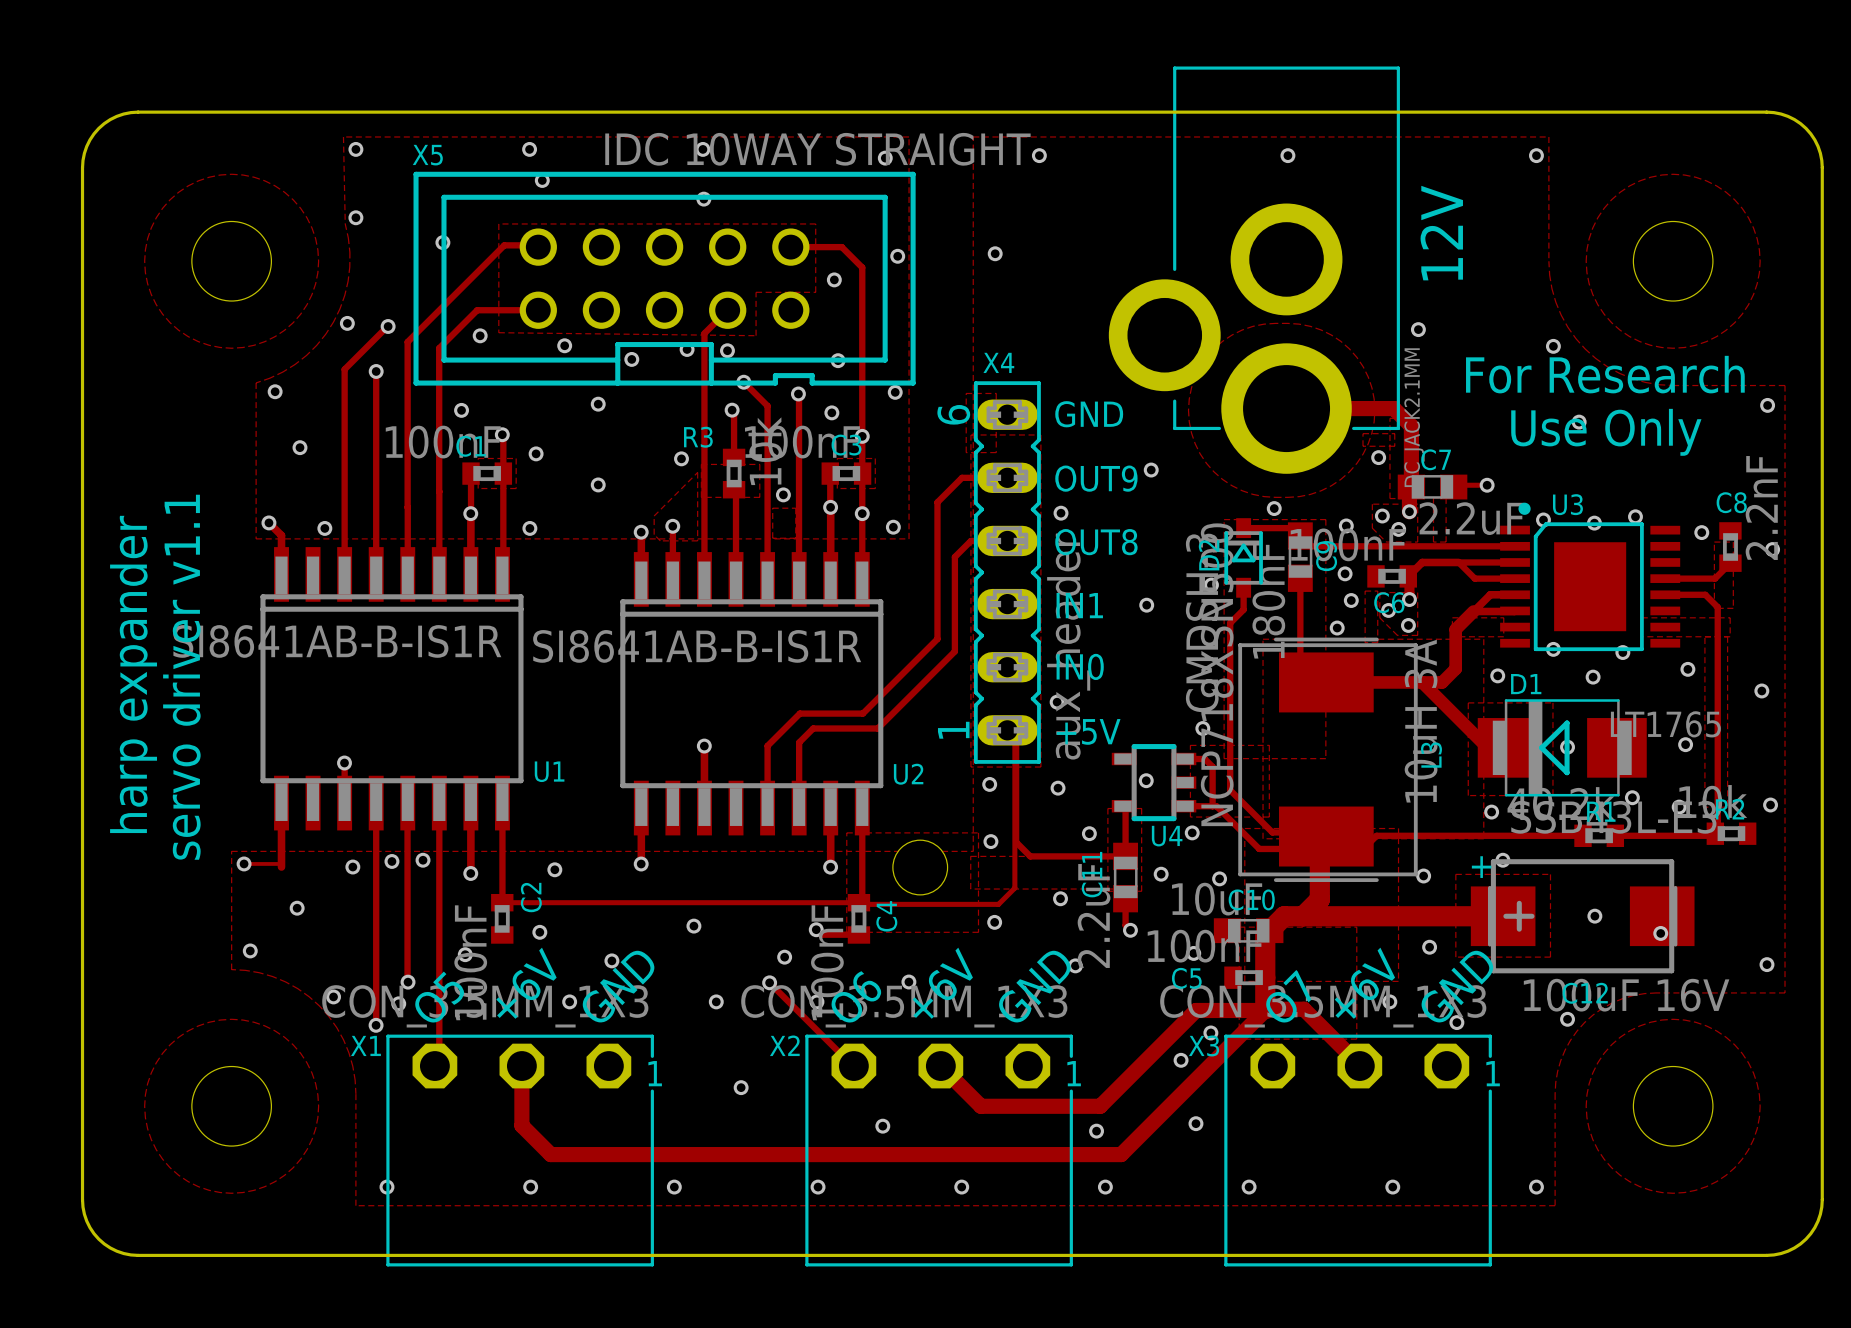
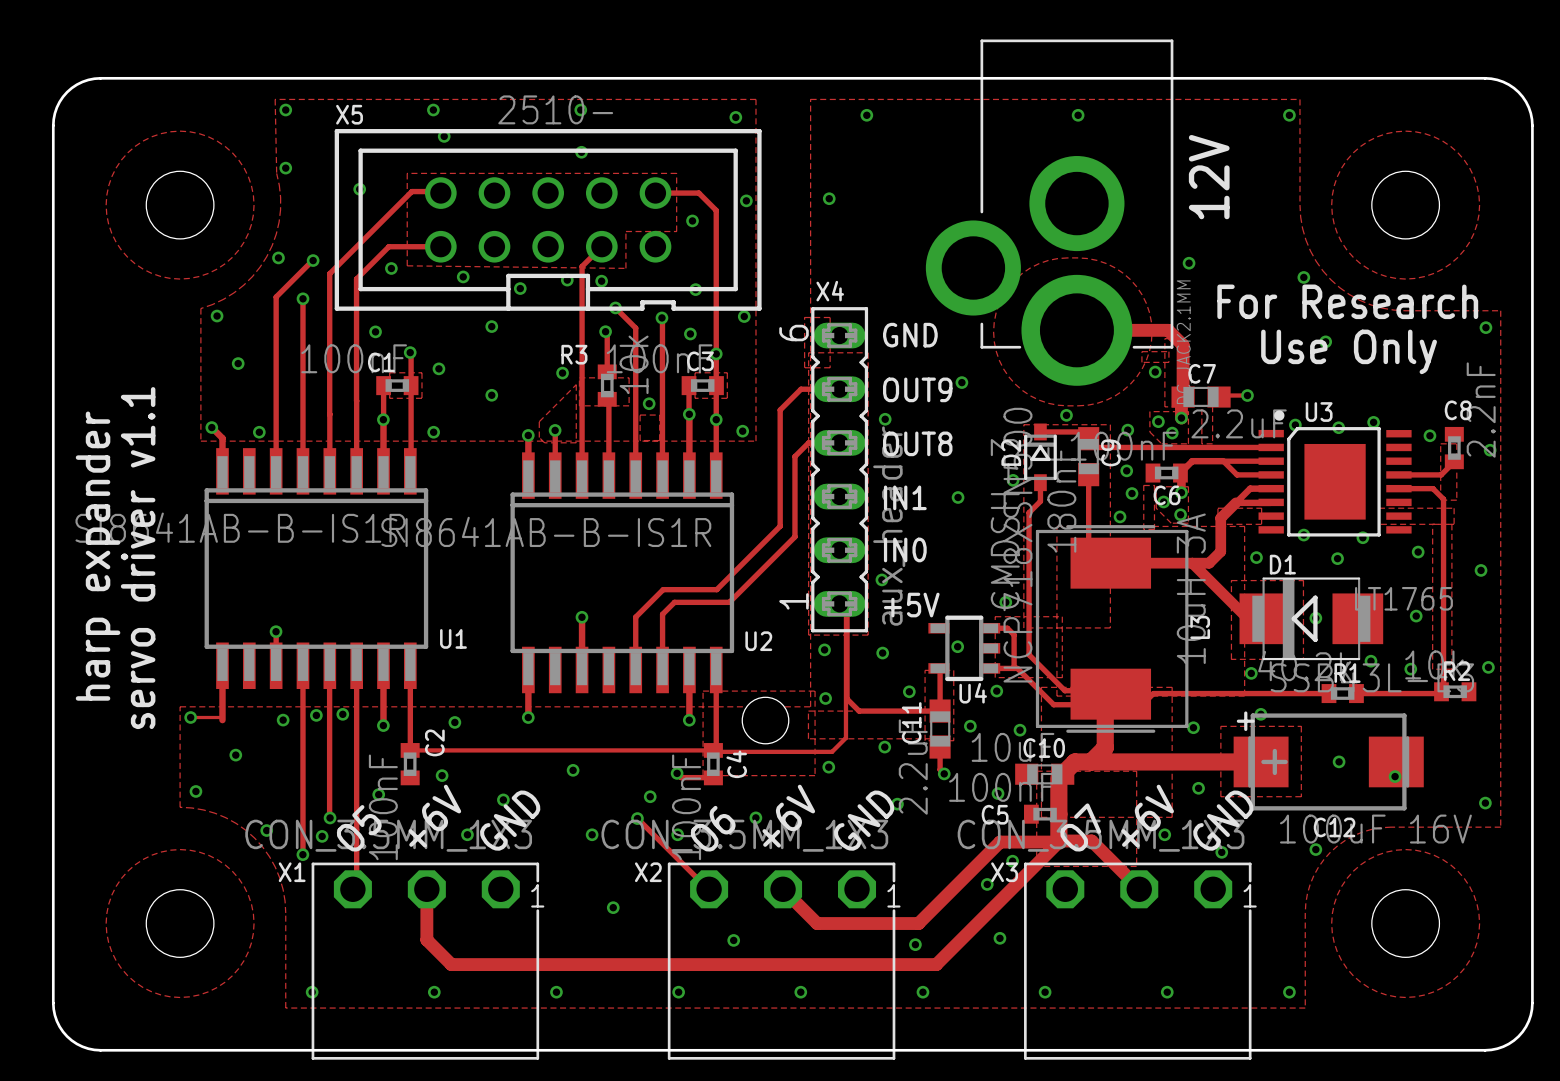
X5 value: IDC 10WAY STRAIGHT (817, 149) -> 2510- (555, 109)

